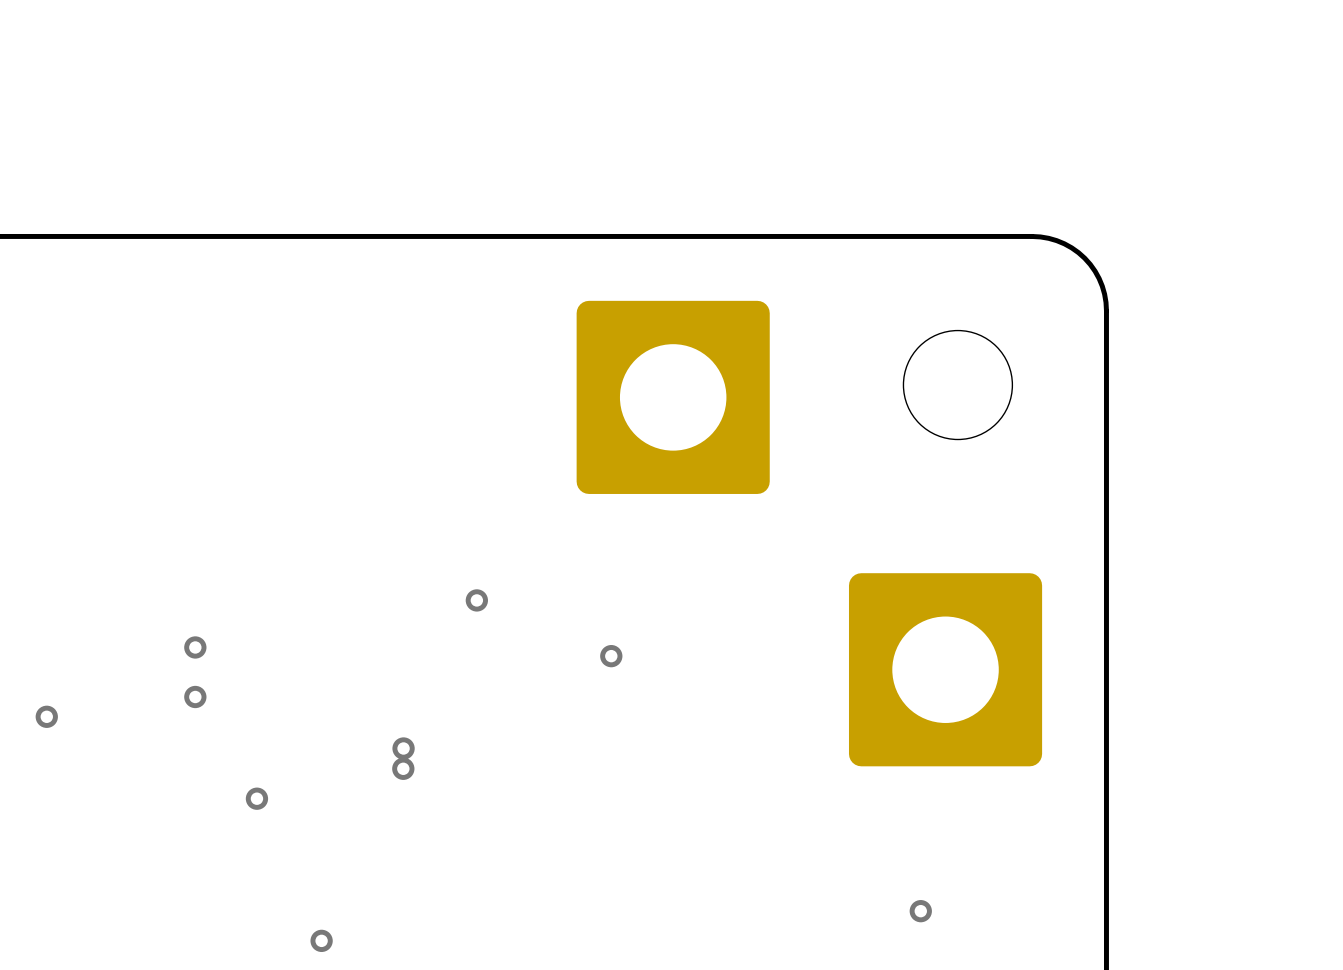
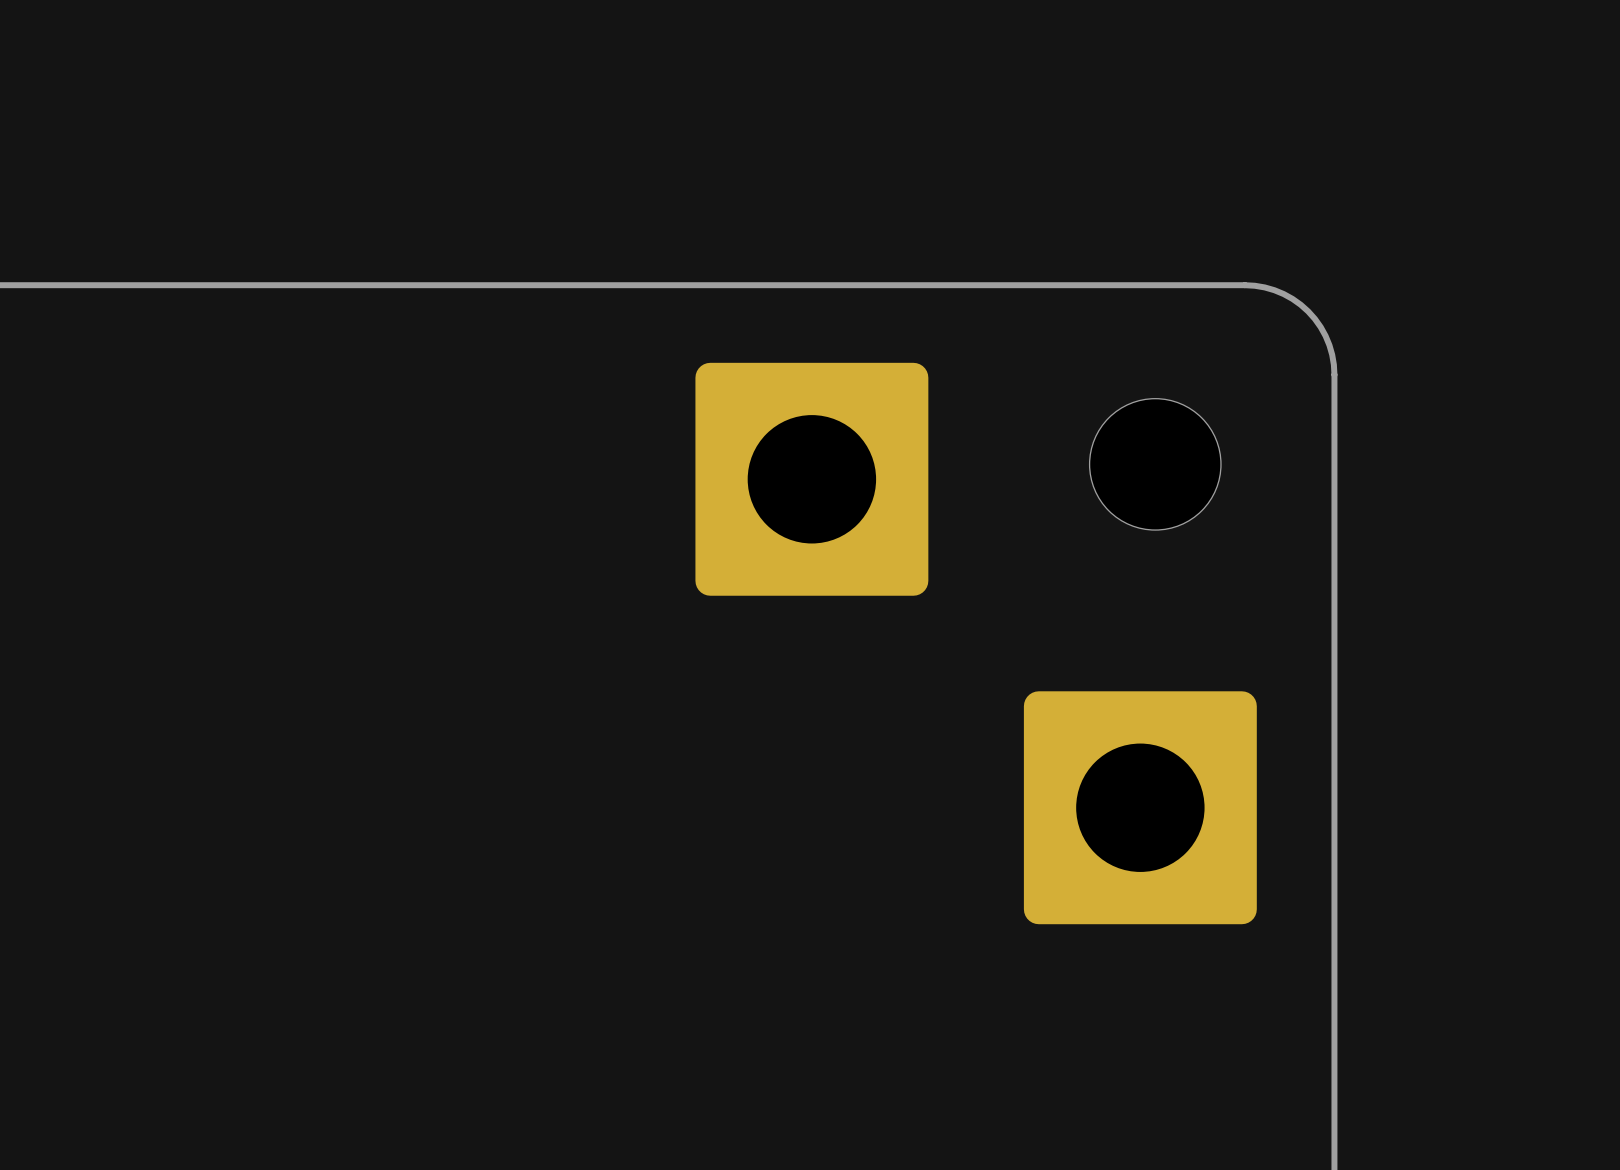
via: (476, 600) -> none
via: (195, 647) -> none
via: (611, 656) -> none
via: (195, 696) -> none
via: (46, 716) -> none
via: (403, 748) -> none
via: (403, 768) -> none
via: (256, 798) -> none
via: (920, 911) -> none
via: (321, 940) -> none

